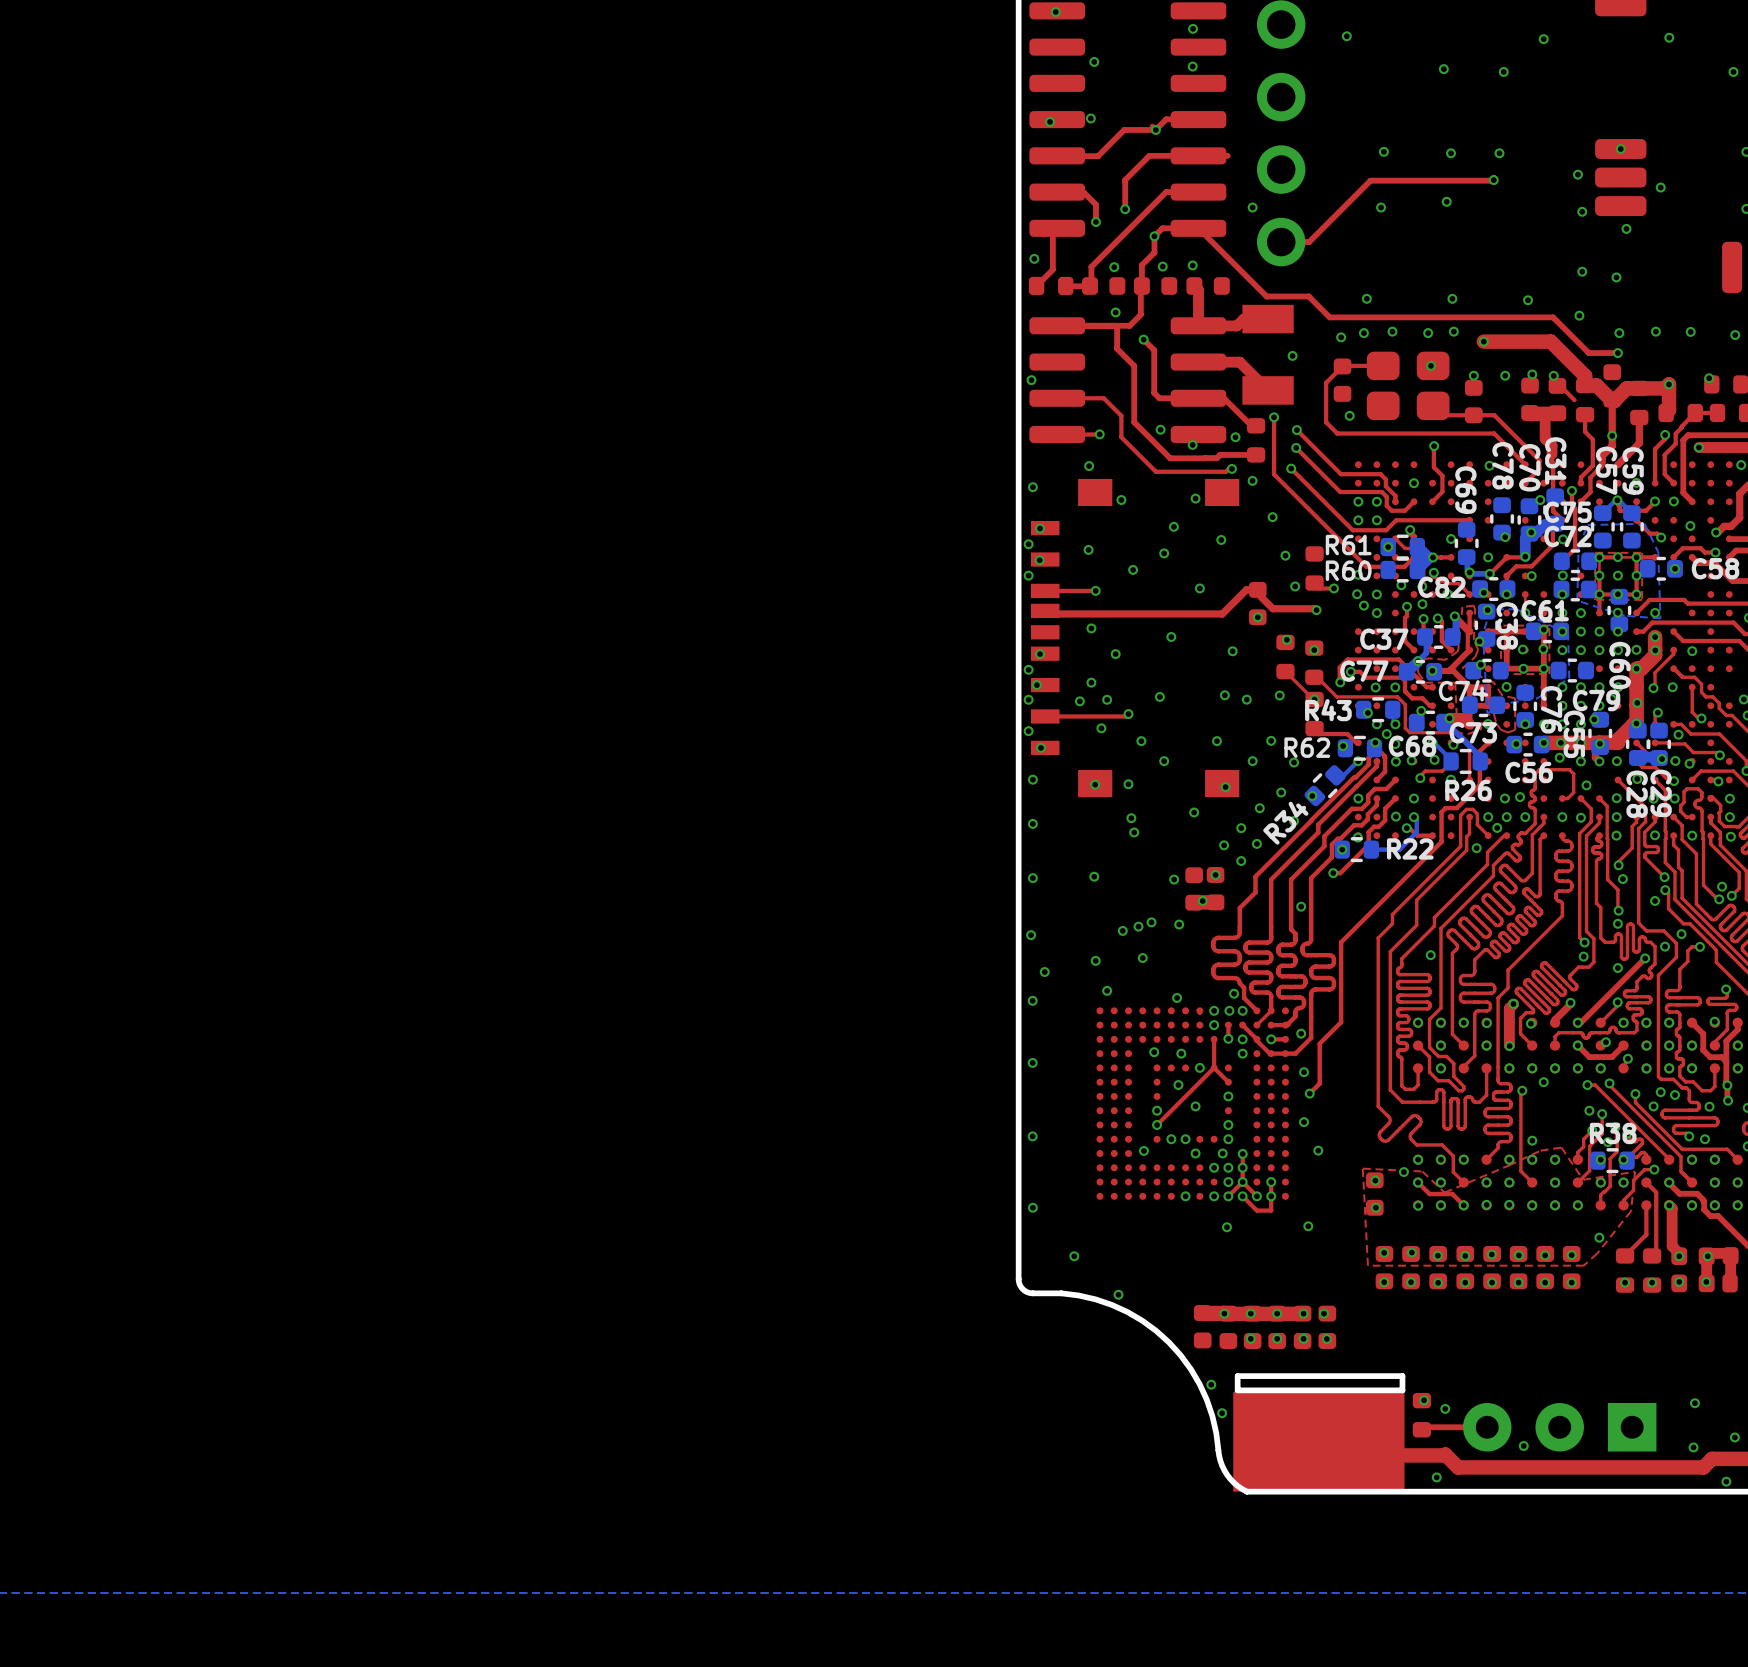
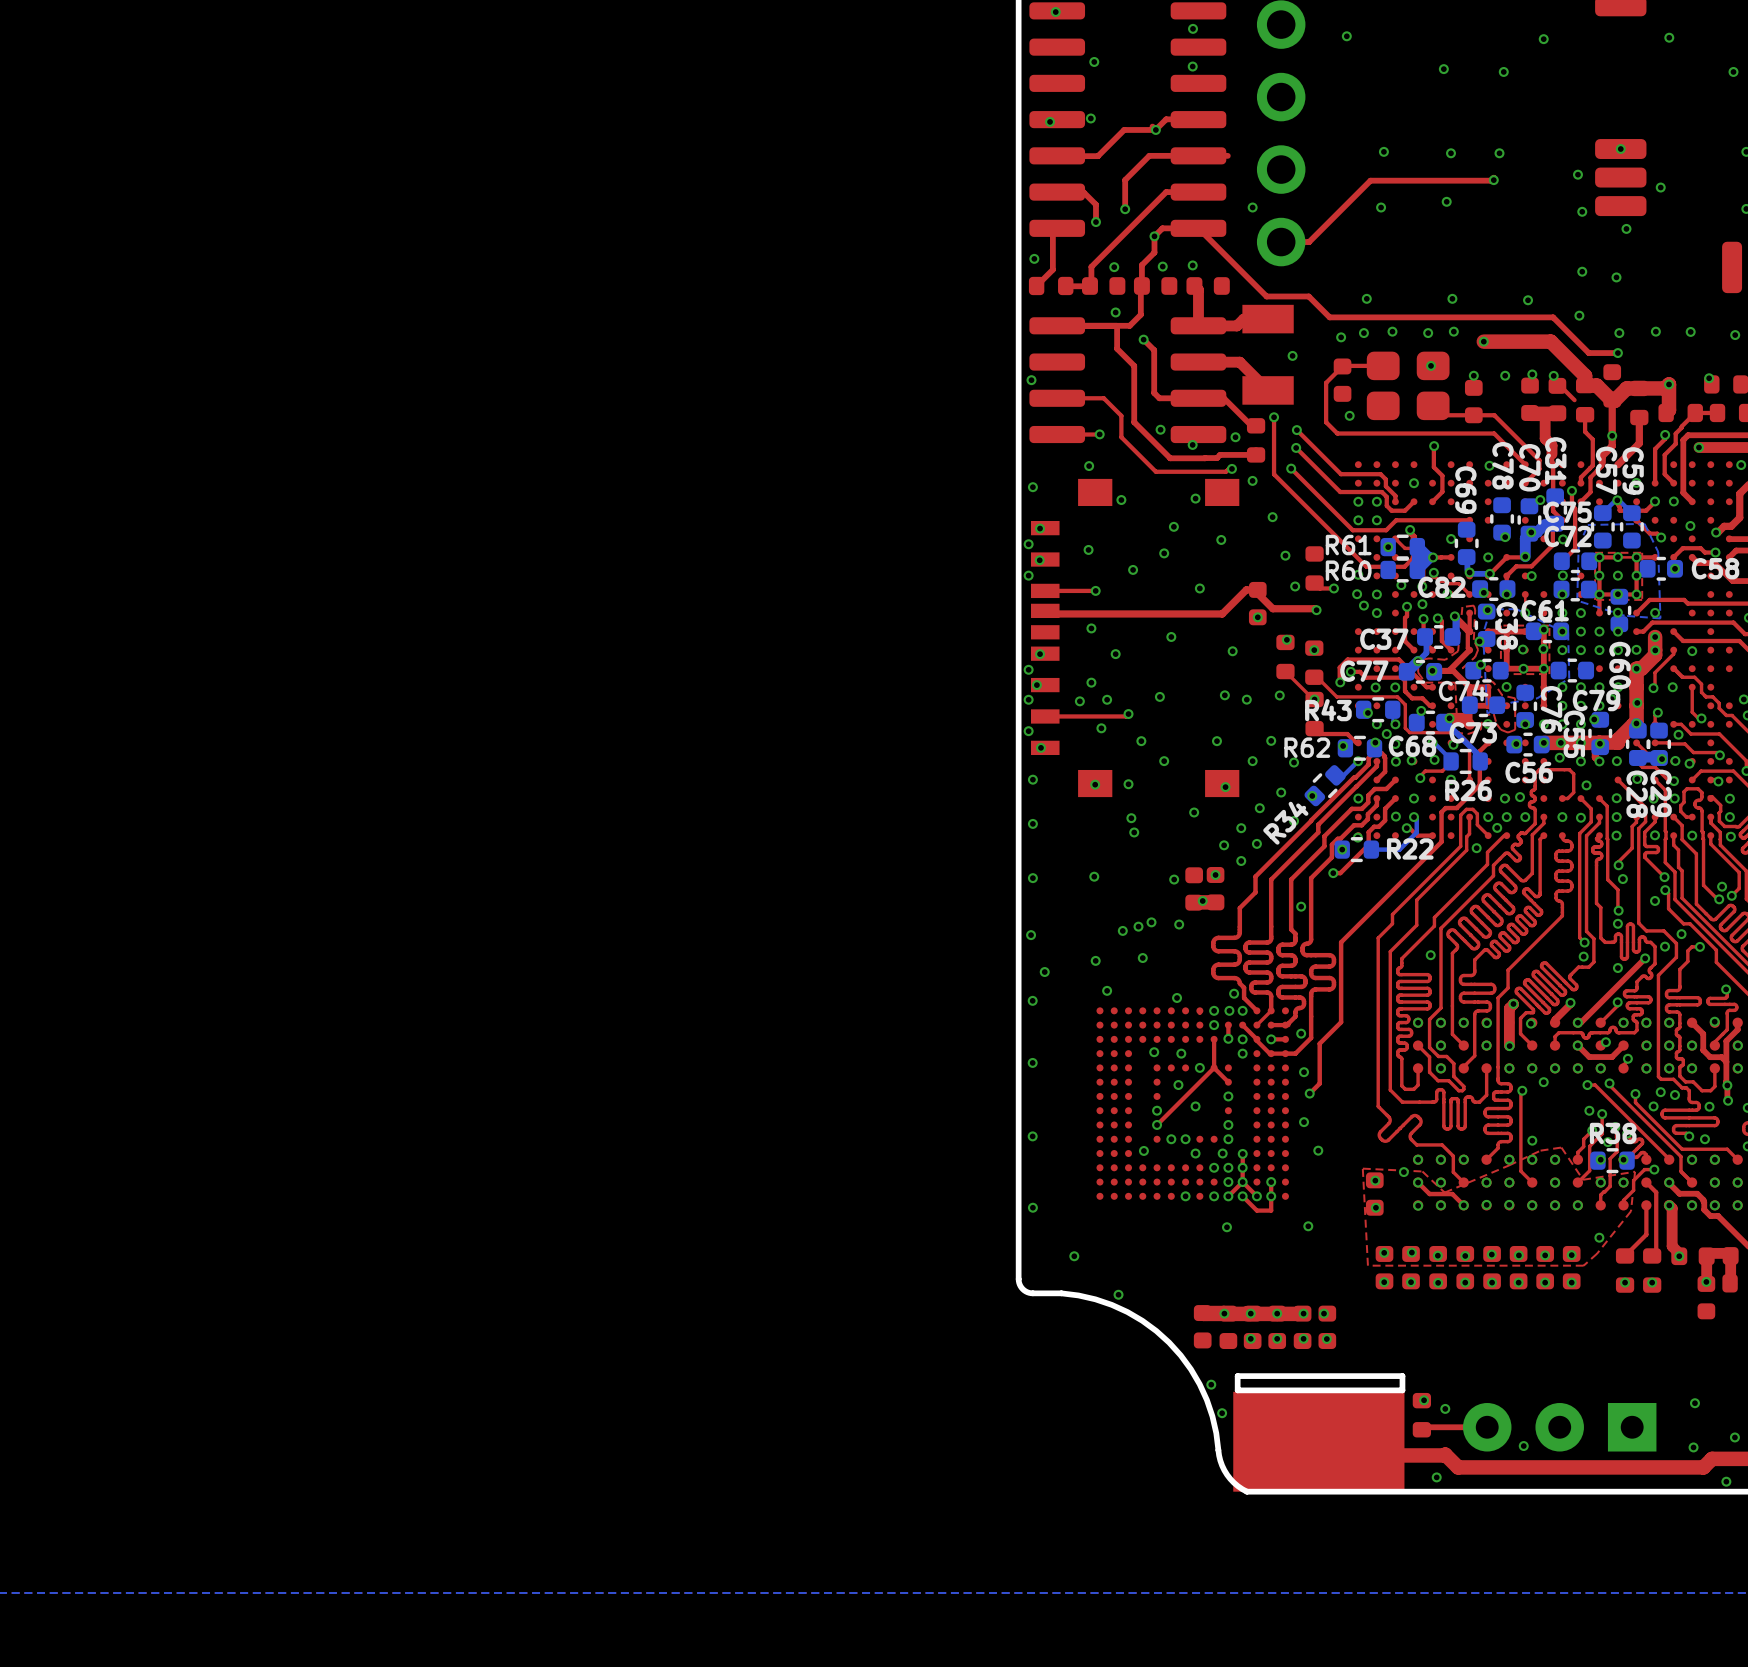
via: (1707, 1256) -> none
via: (1679, 1281) -> none
part rotation: 0° (1692, 1283) -> 90° clockwise (1706, 1297)

